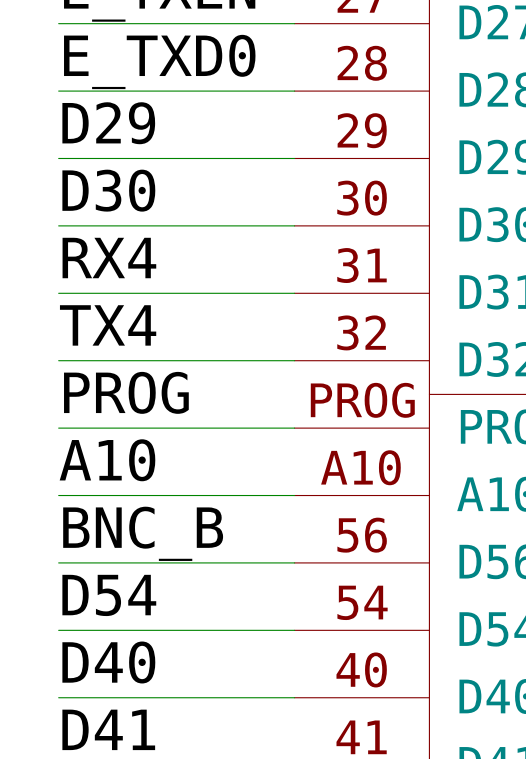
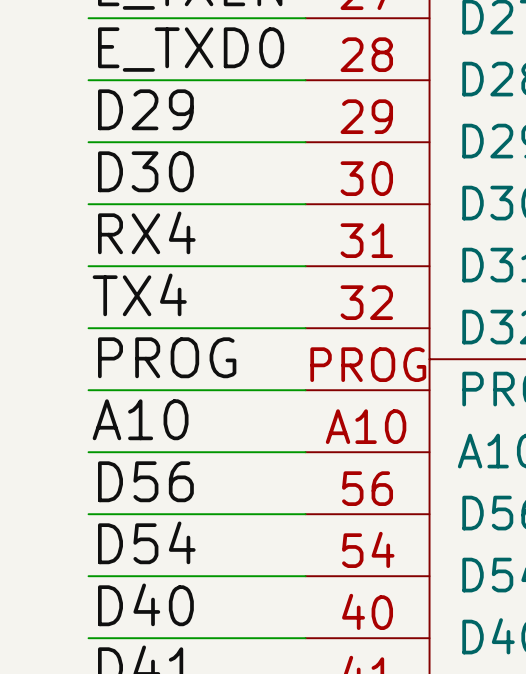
label: BNC_B (143, 533) -> D56 (145, 481)

